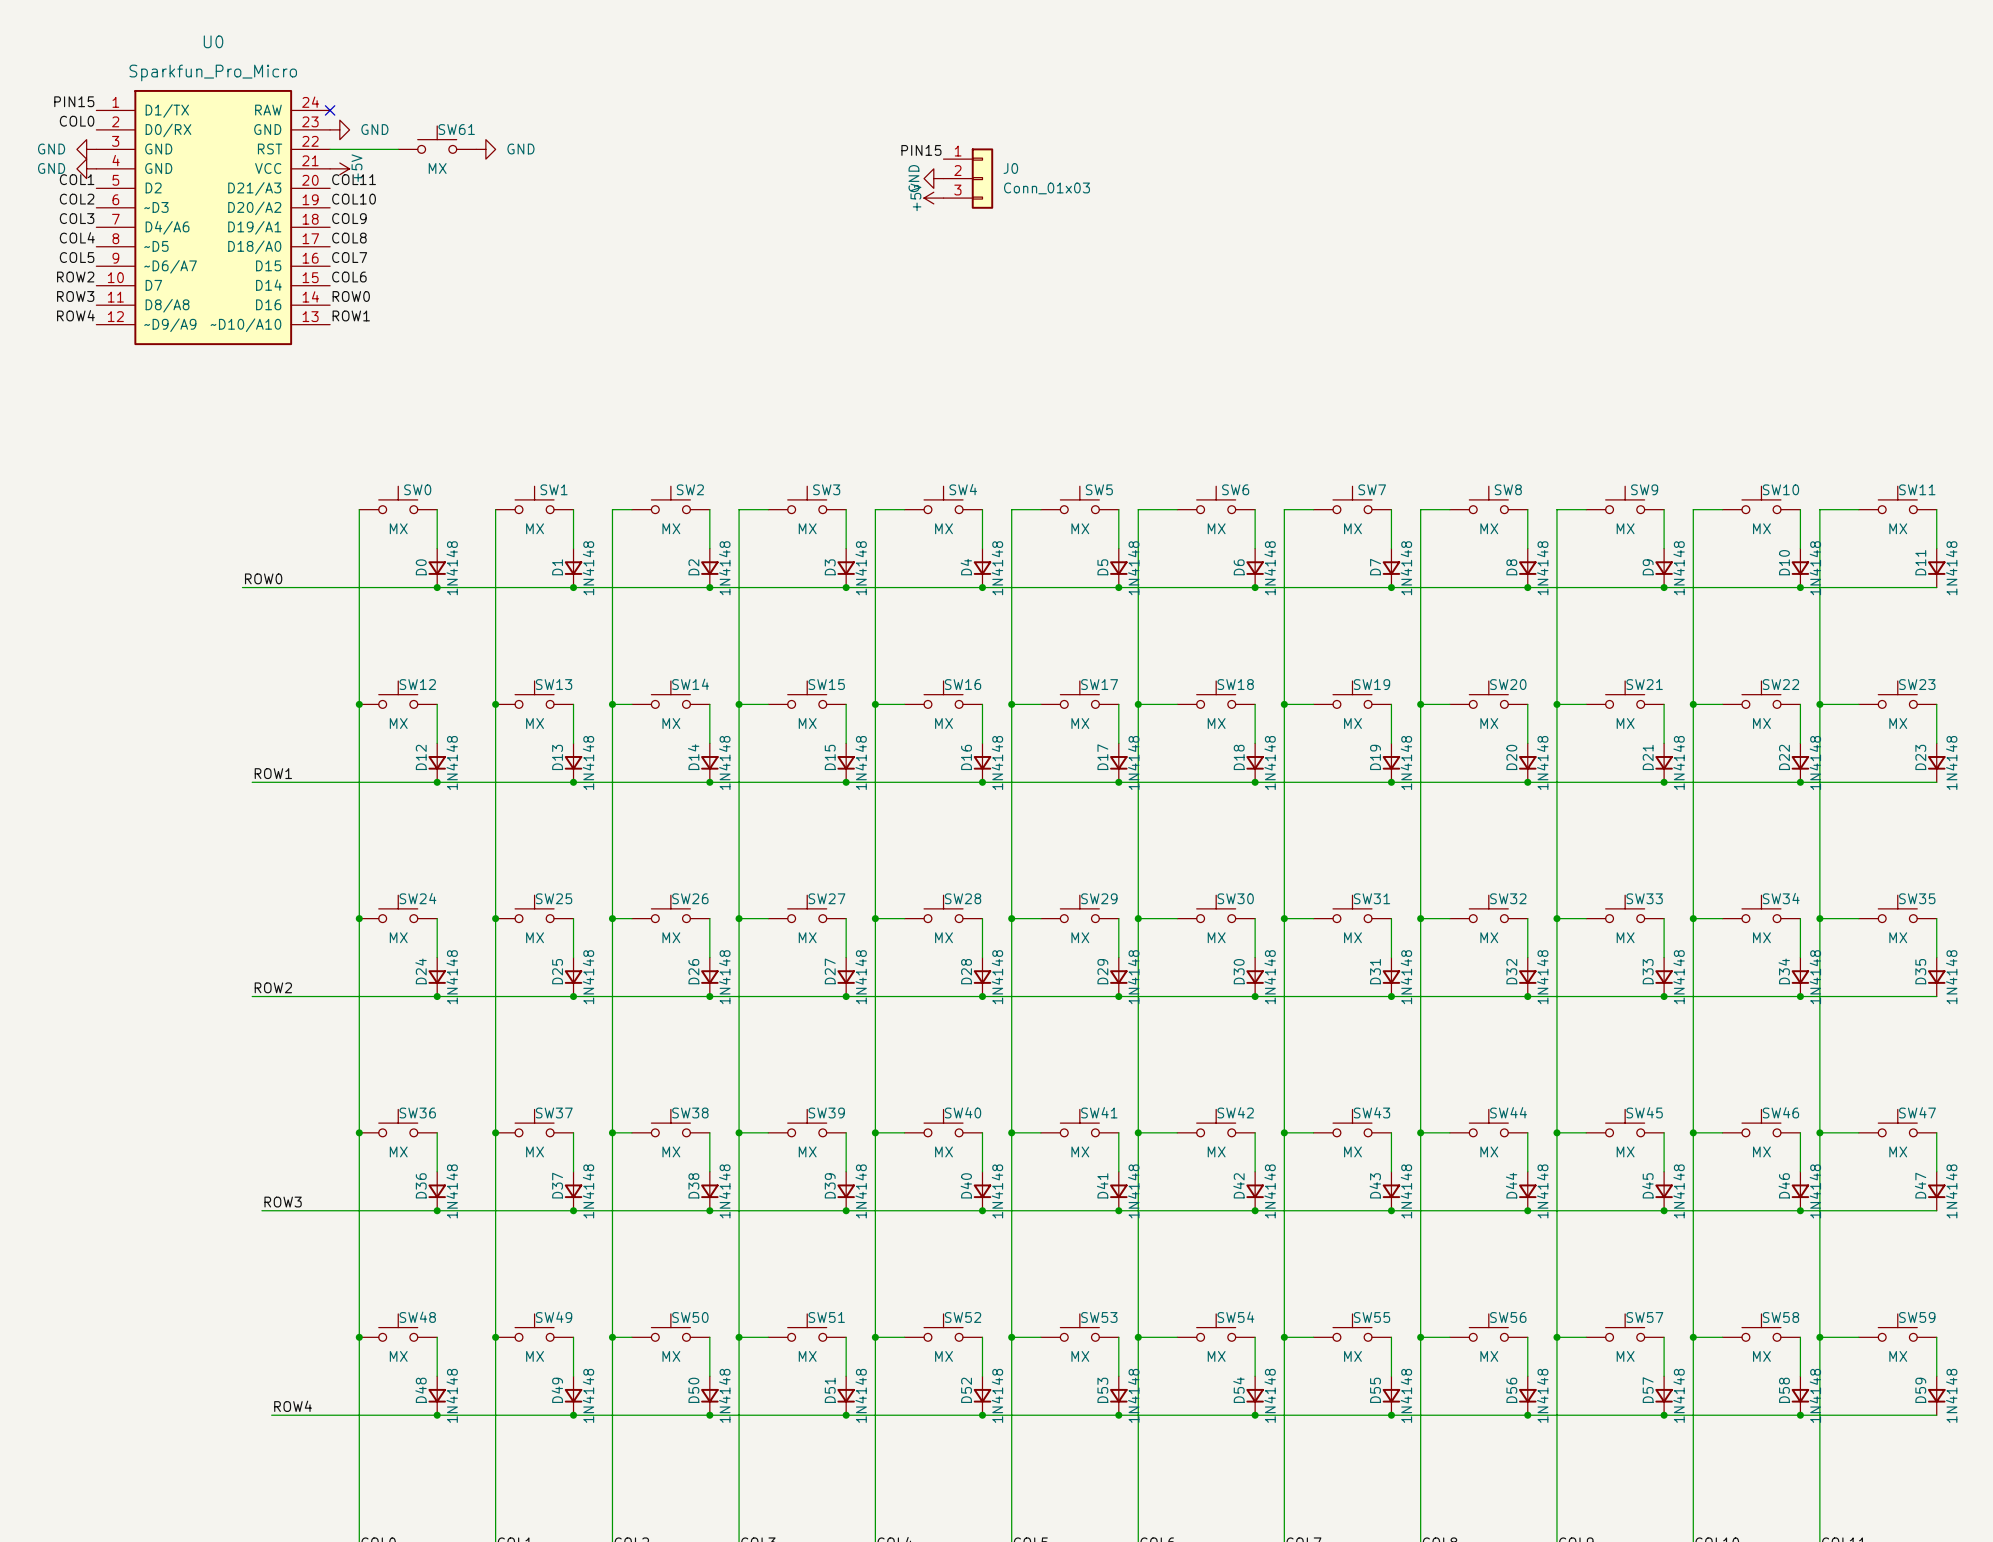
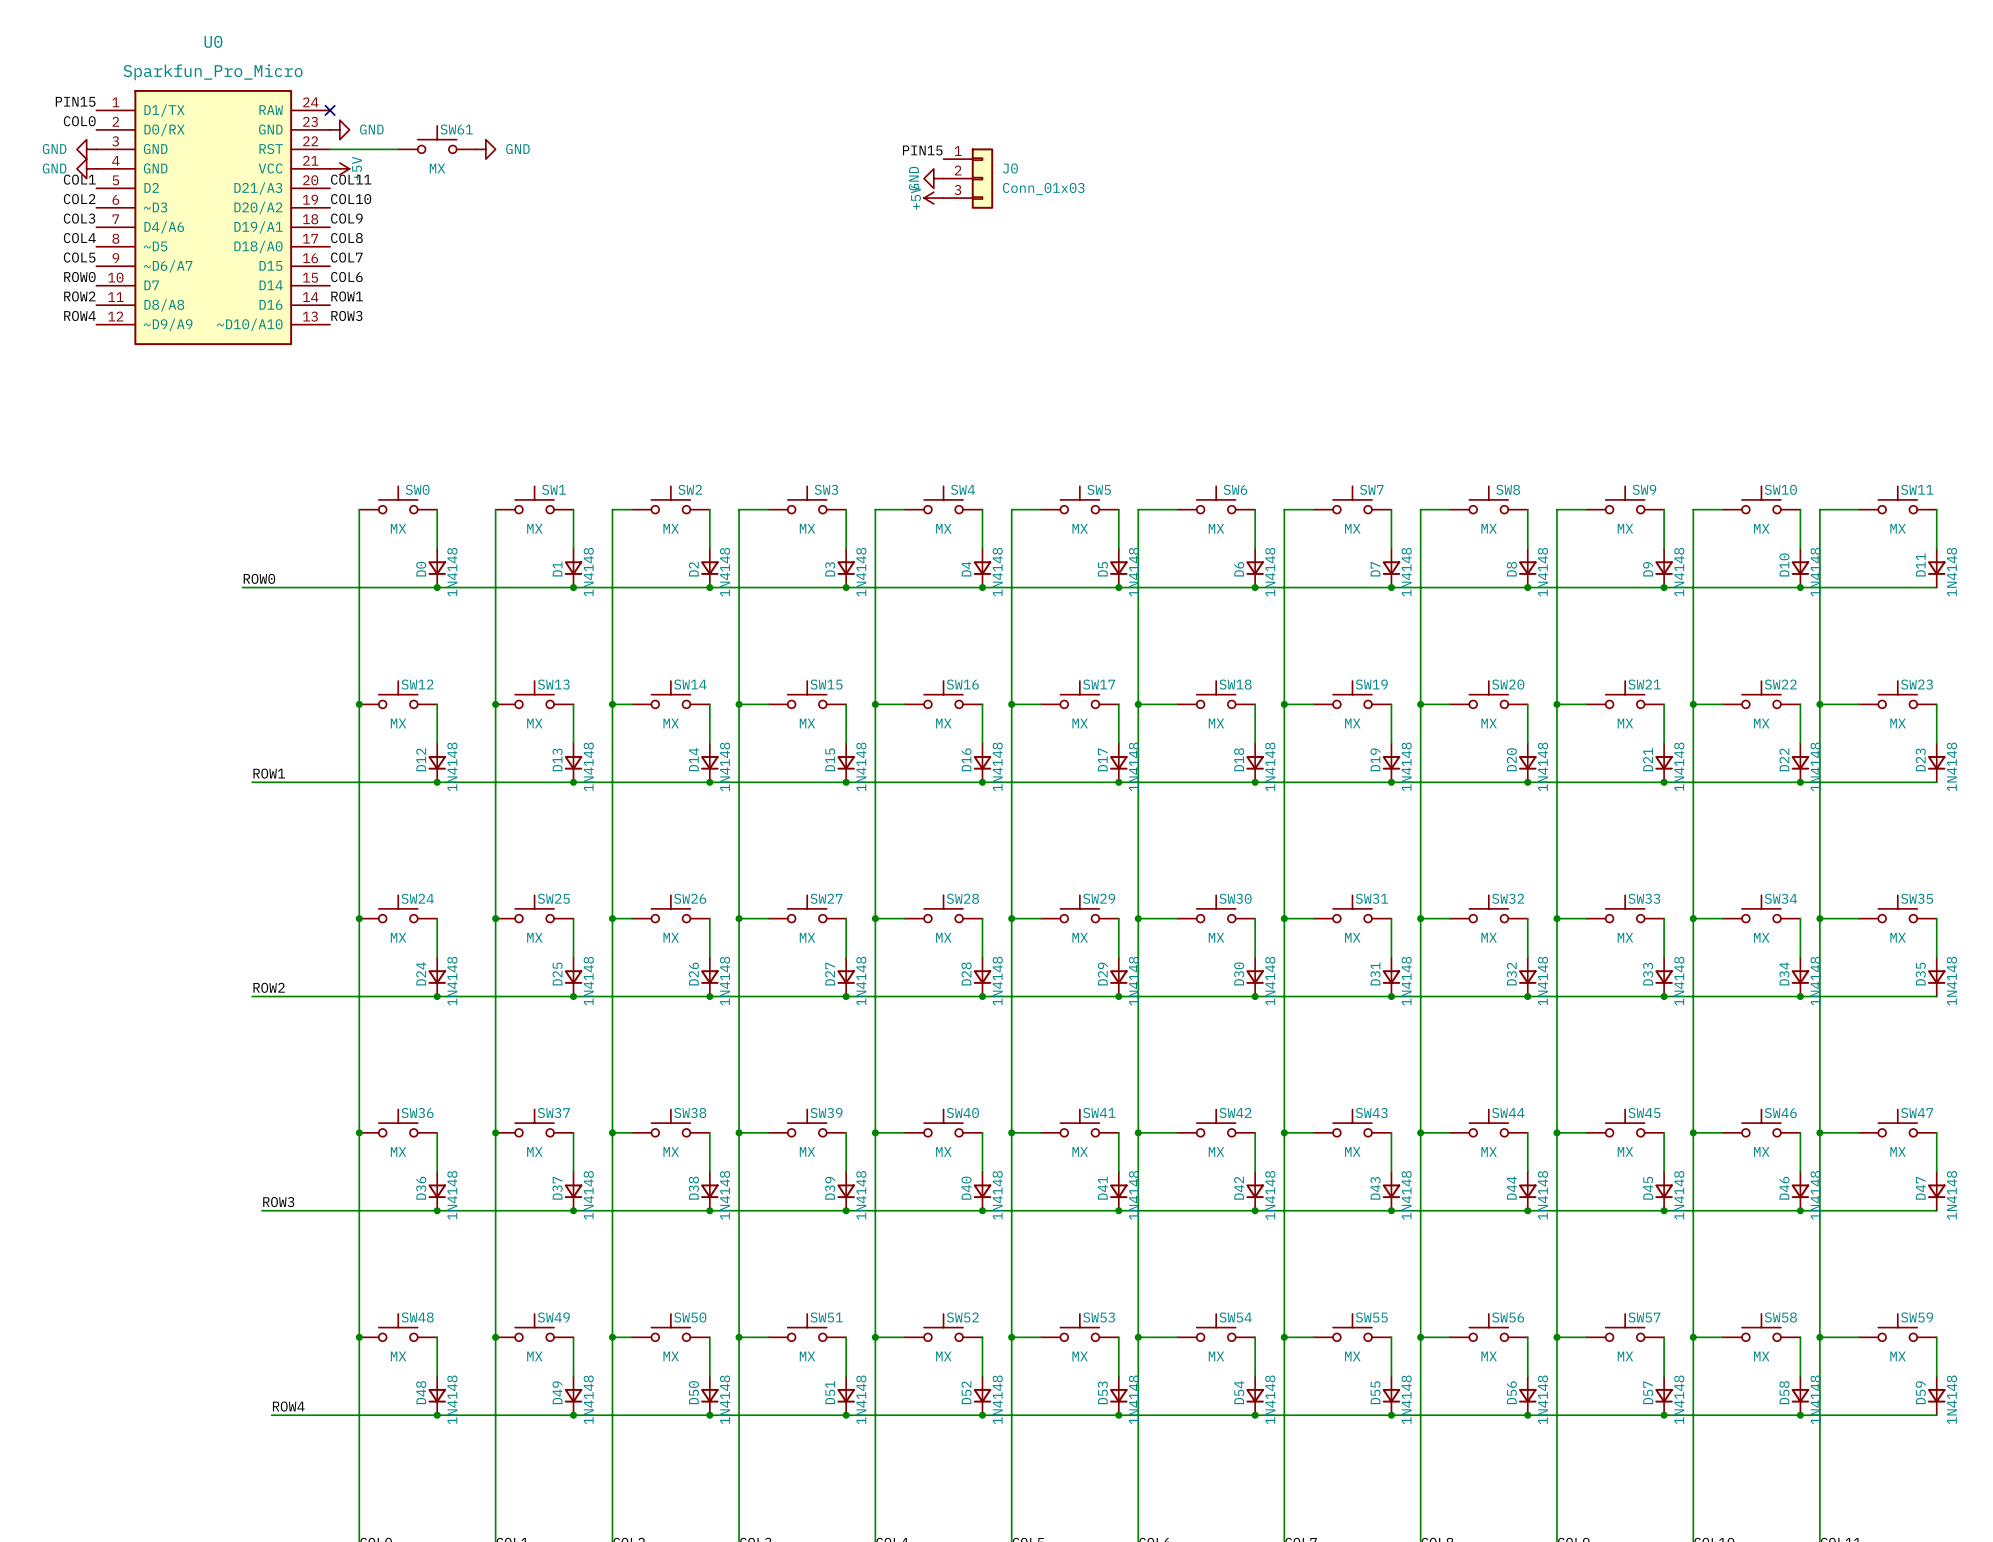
label: ROW2 (75, 277) -> ROW0 (79, 277)
label: ROW3 (75, 296) -> ROW2 (79, 296)
label: ROW0 (351, 296) -> ROW1 (347, 296)
label: ROW1 (351, 315) -> ROW3 (346, 315)

